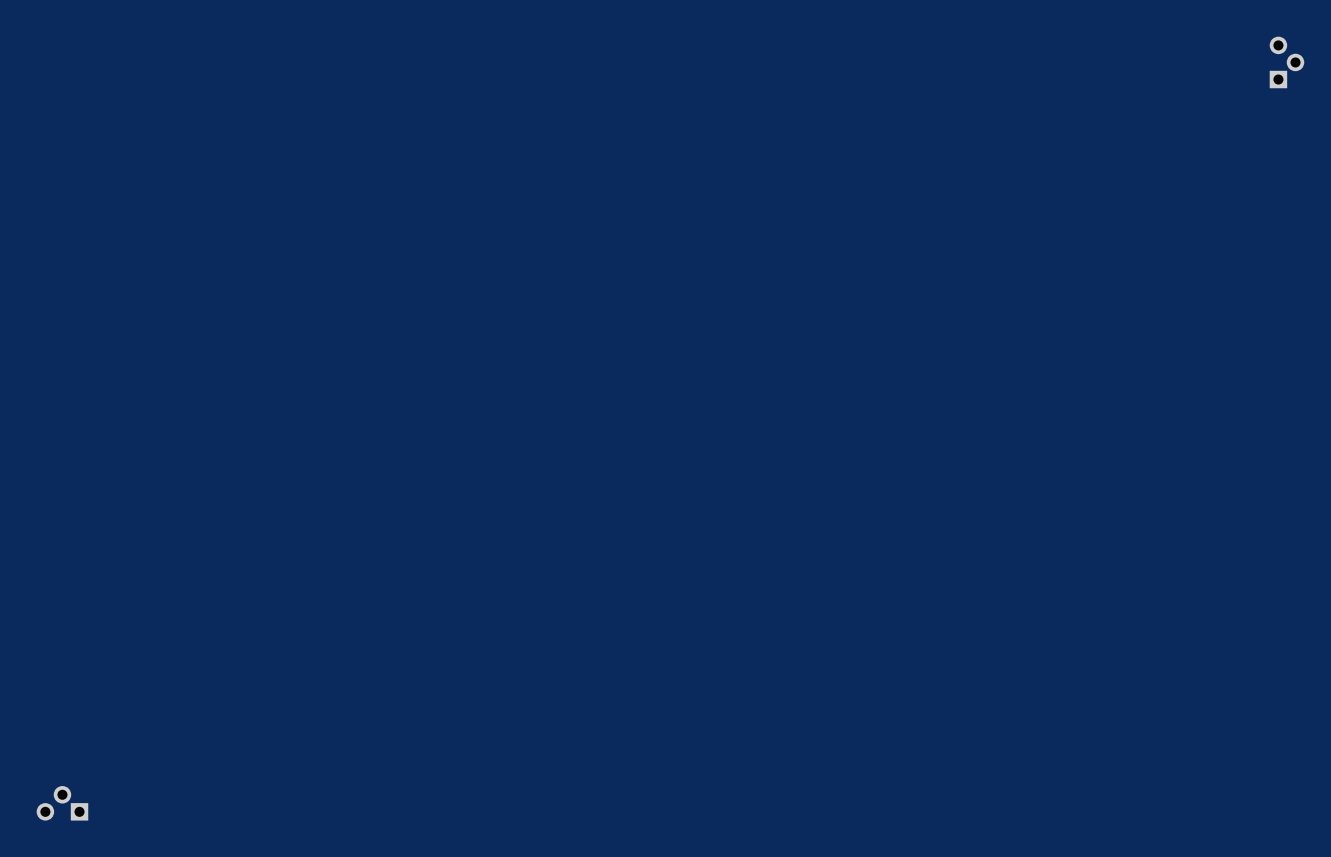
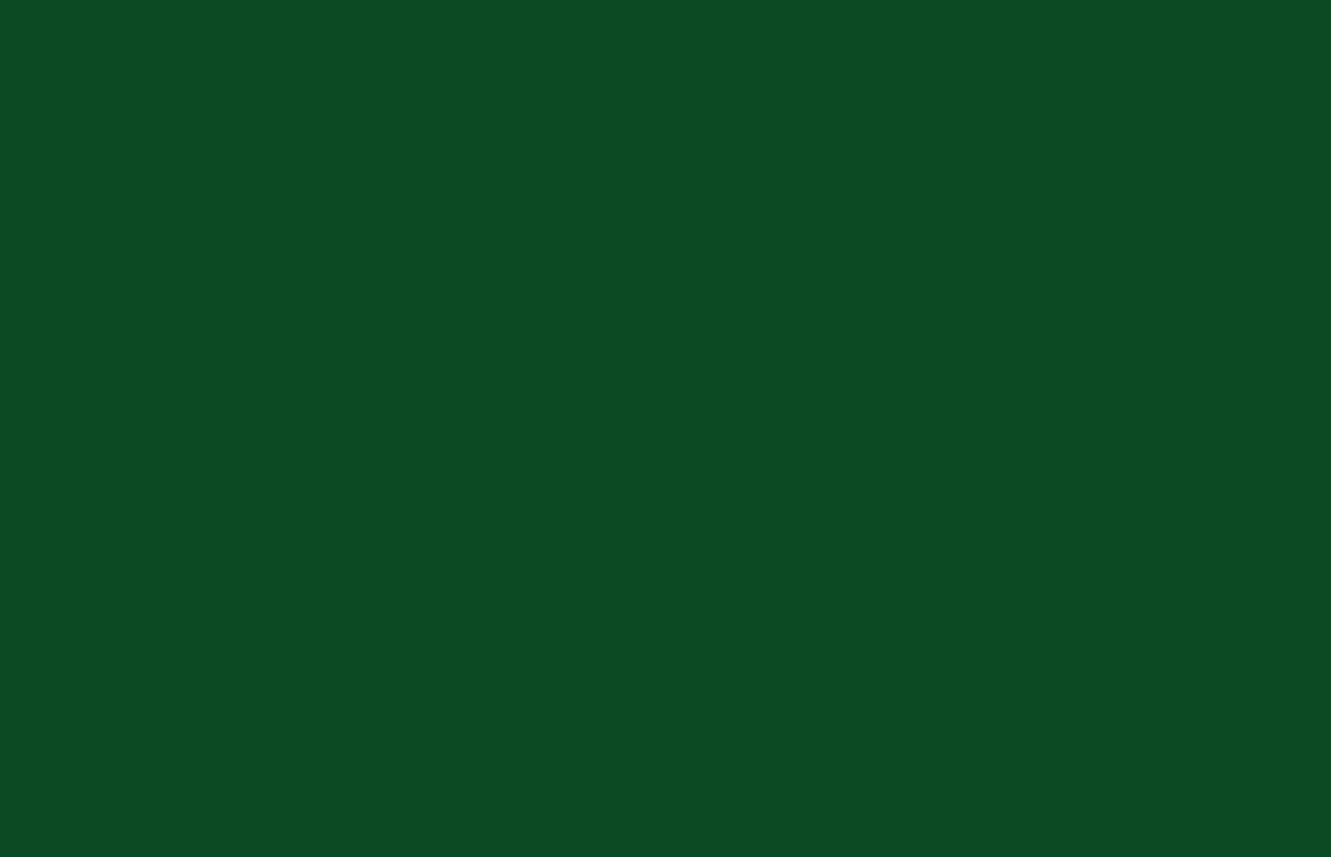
part: (1286, 62) -> none
part: (62, 803) -> none

